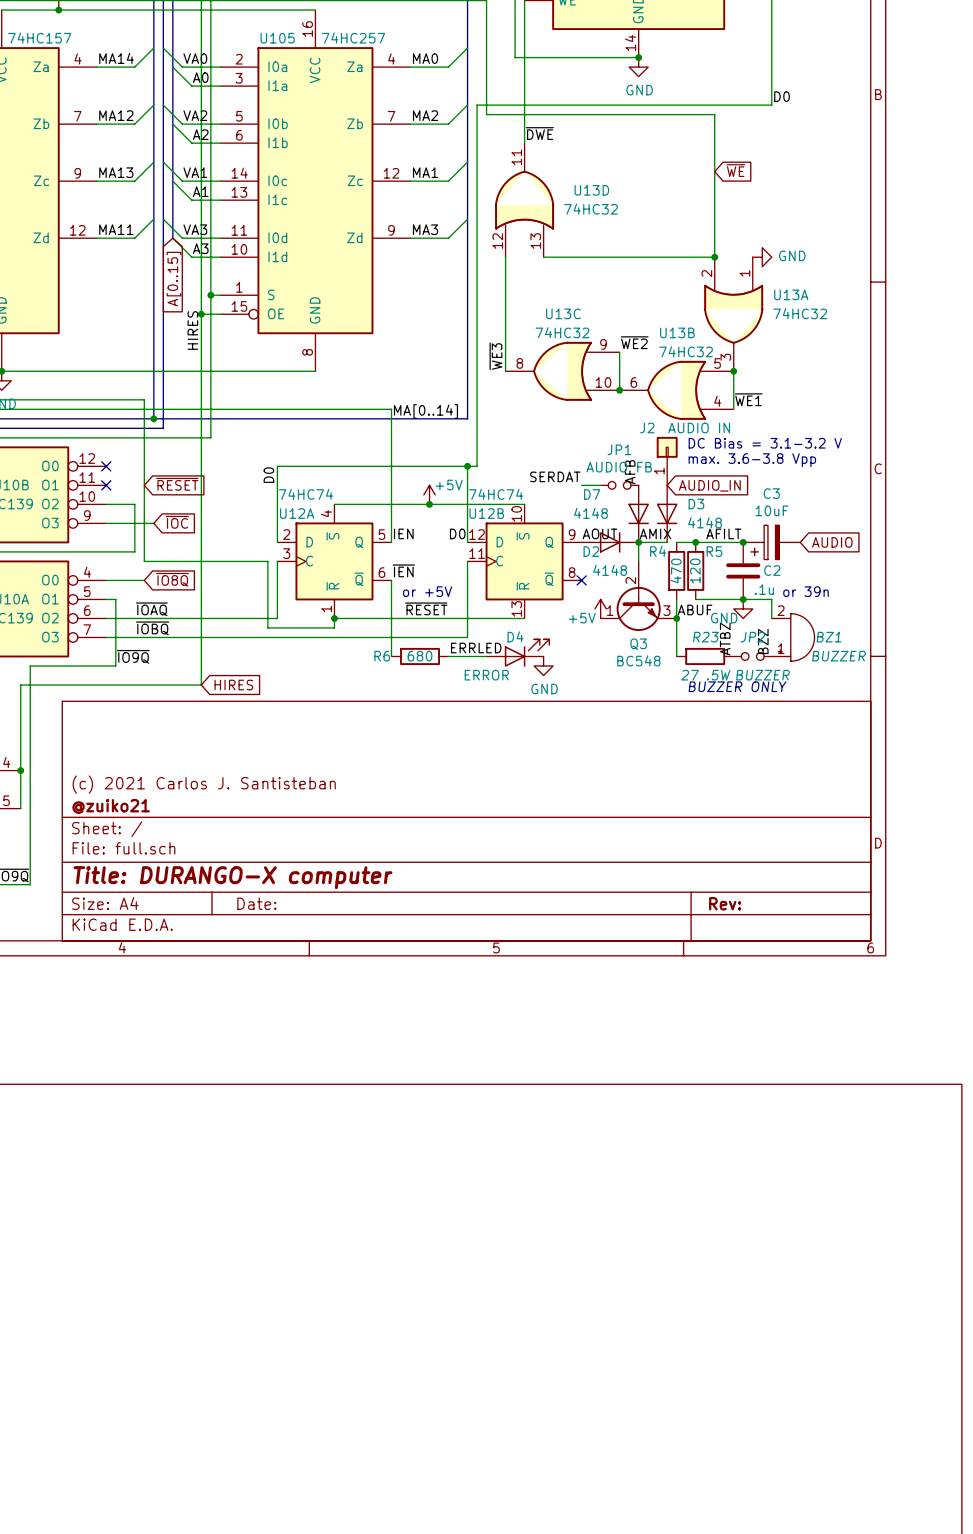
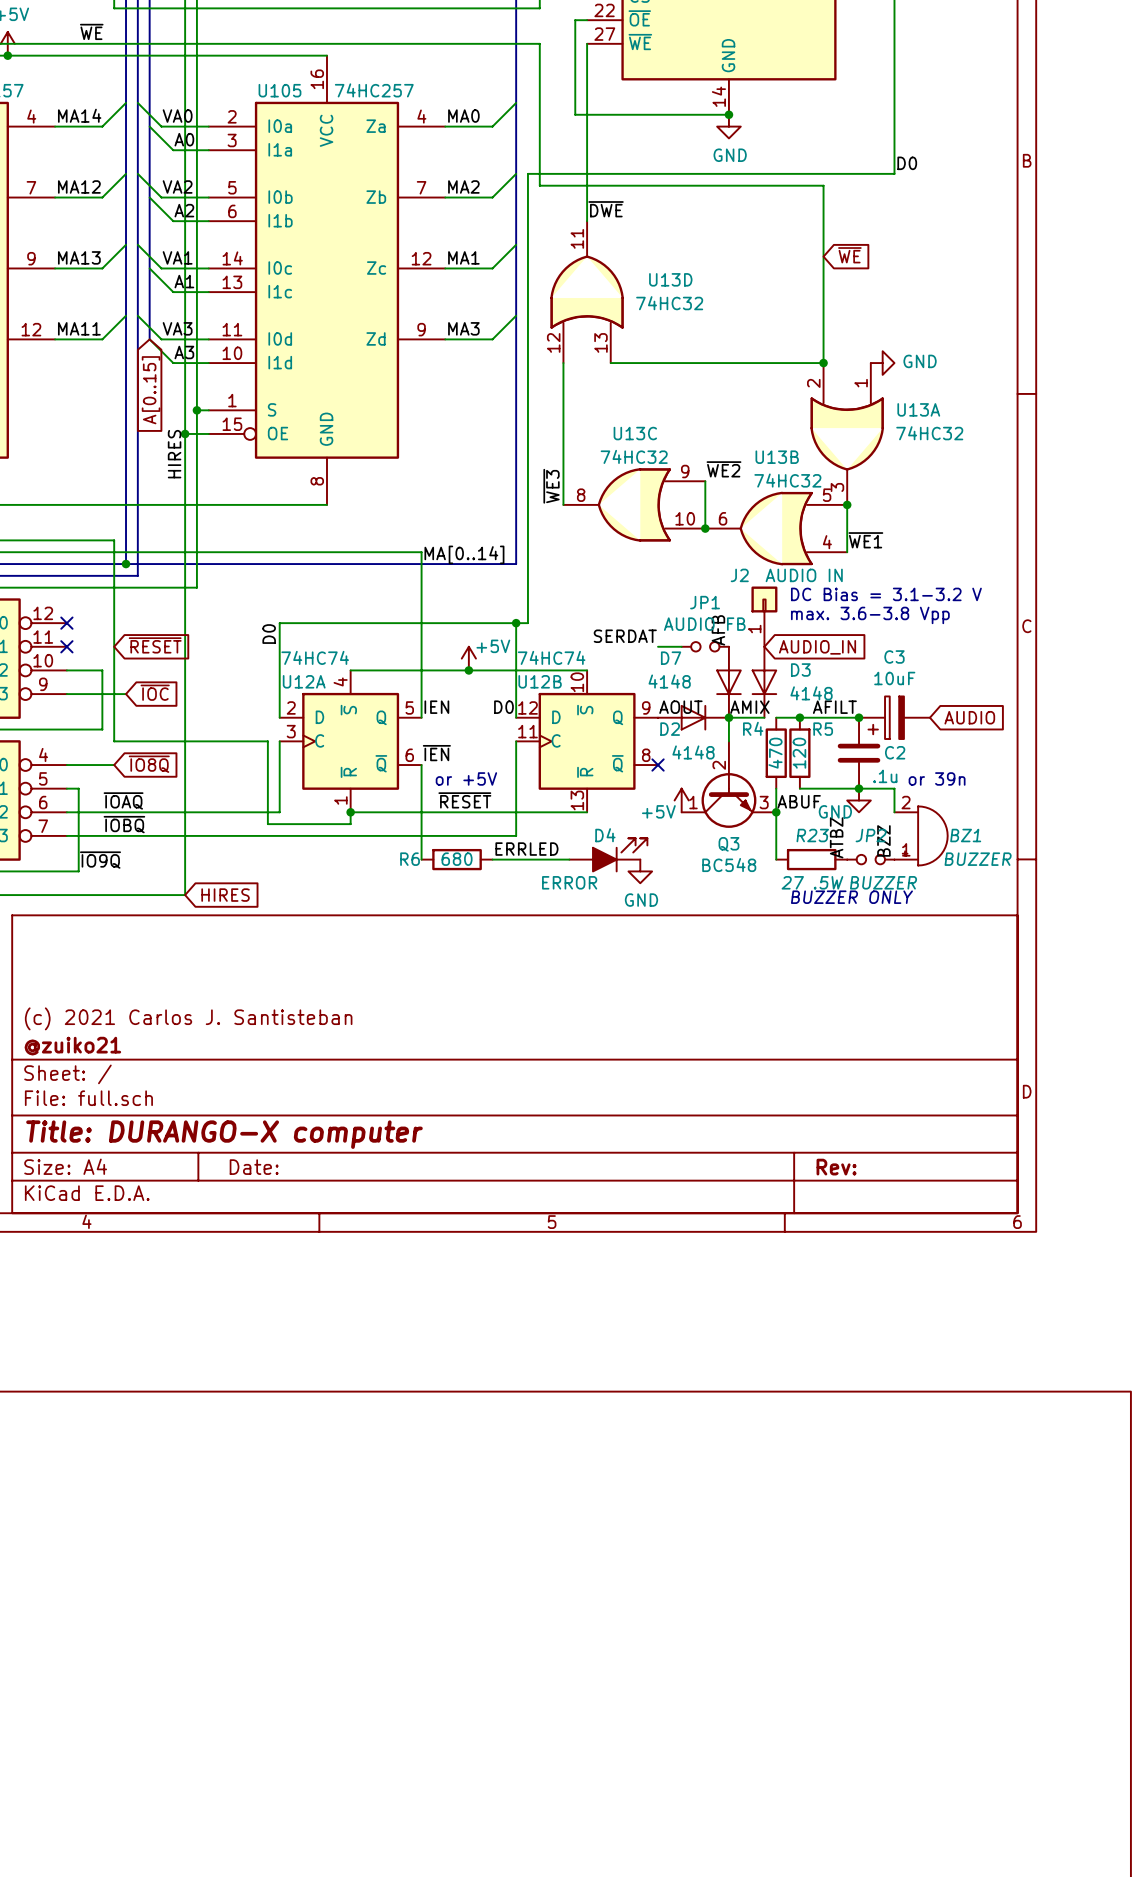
D4 symbol: [486, 639, 550, 667] -> [569, 838, 648, 873]
power symbol position: GND (543, 666) -> GND (640, 871)

